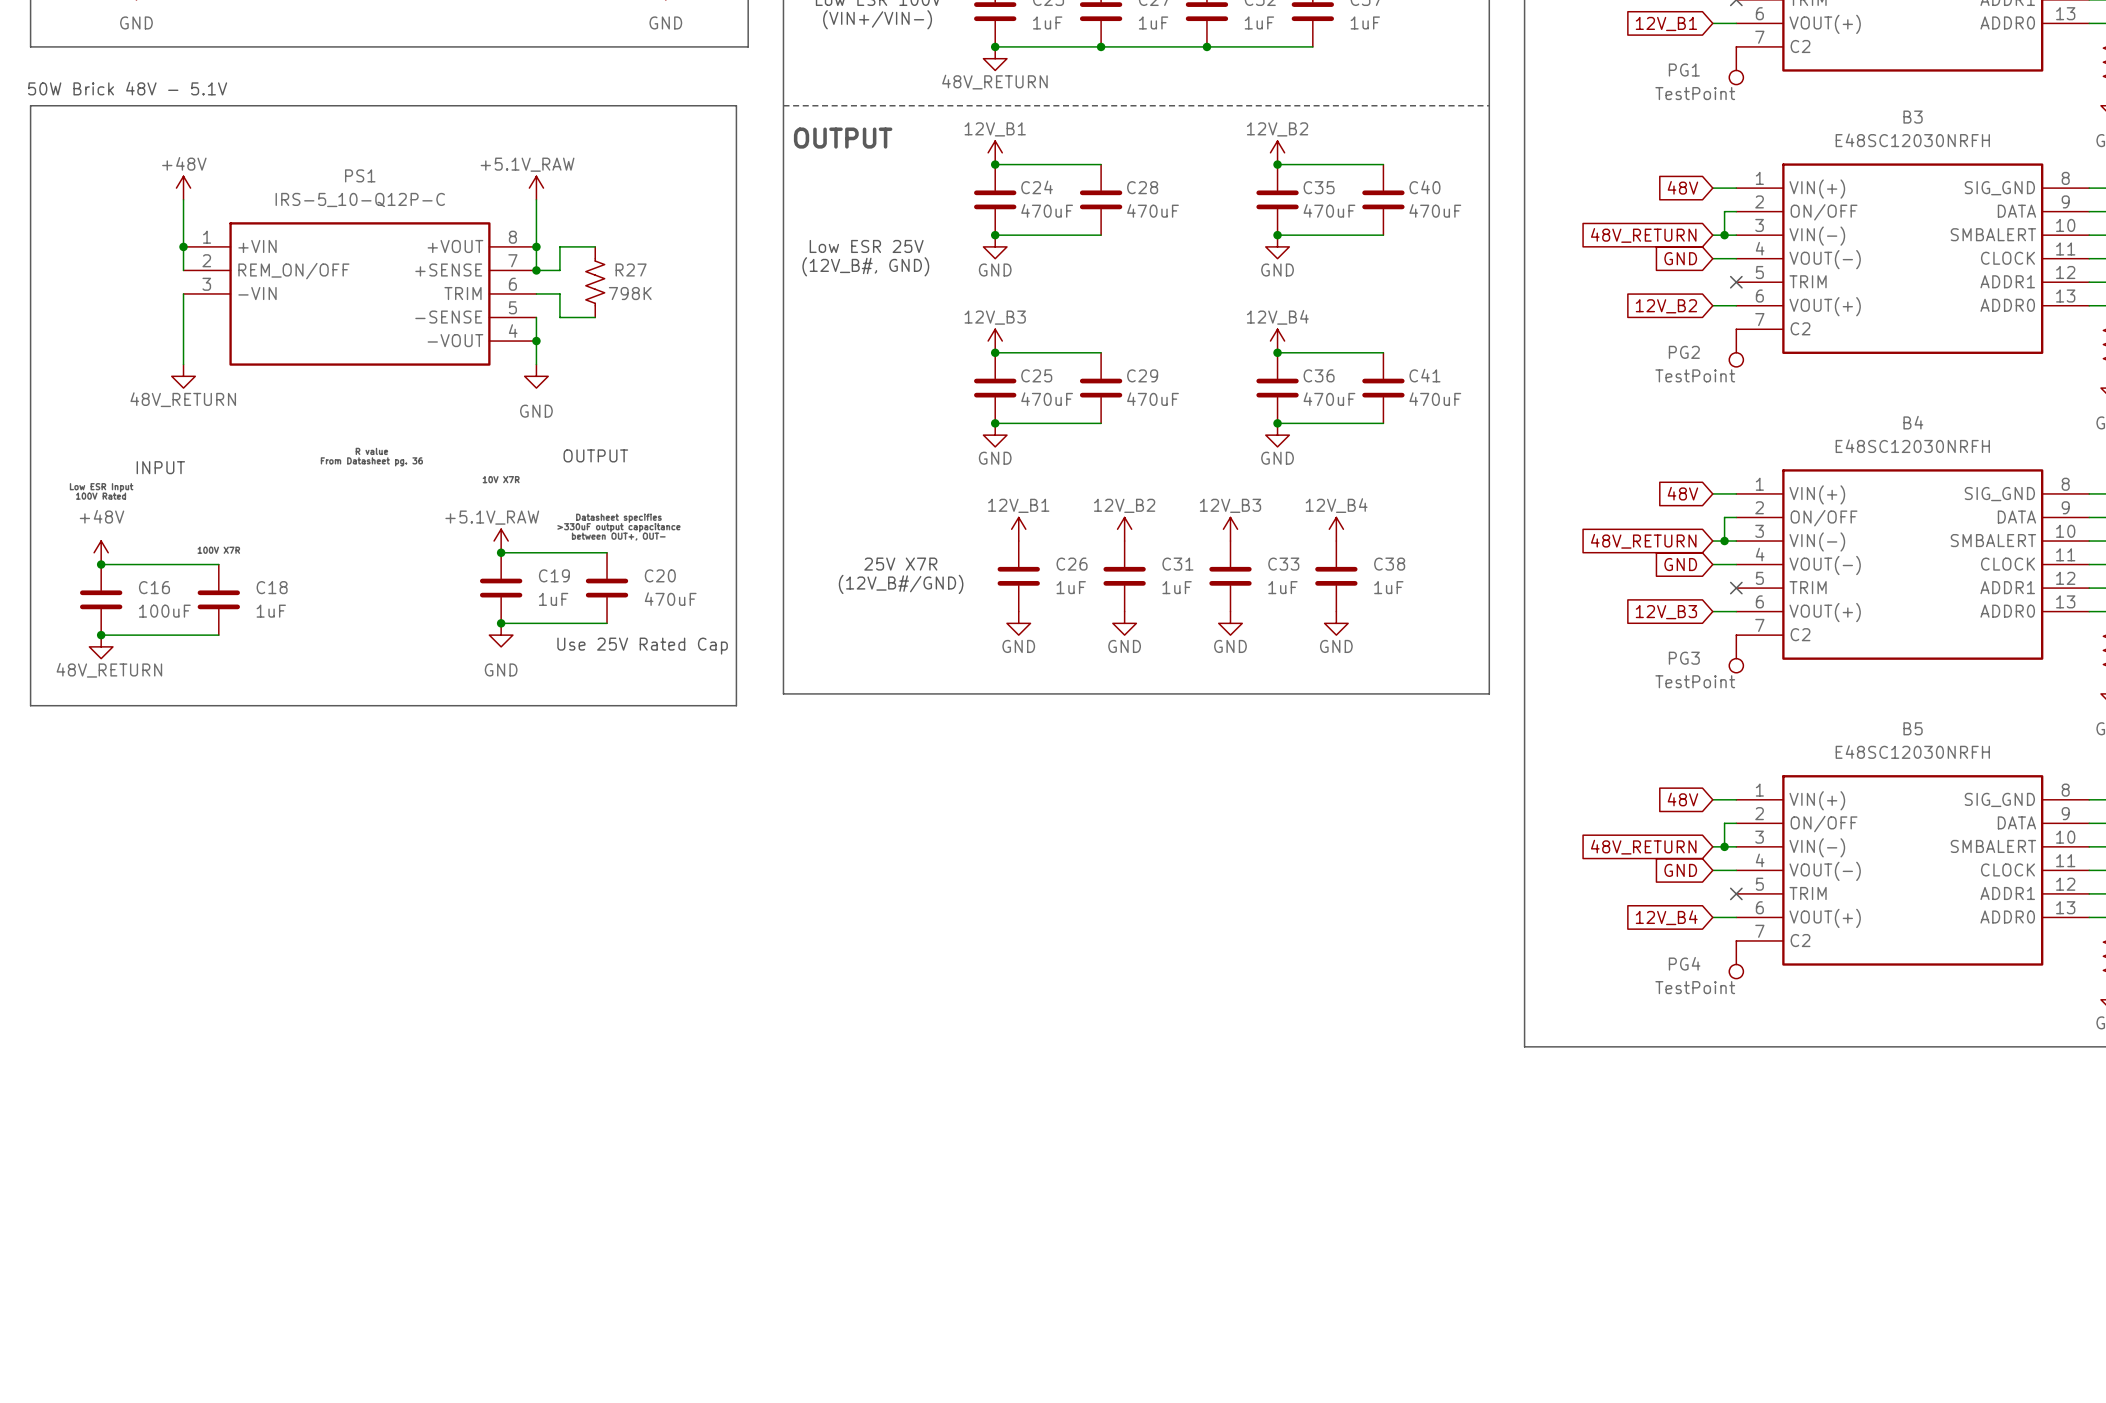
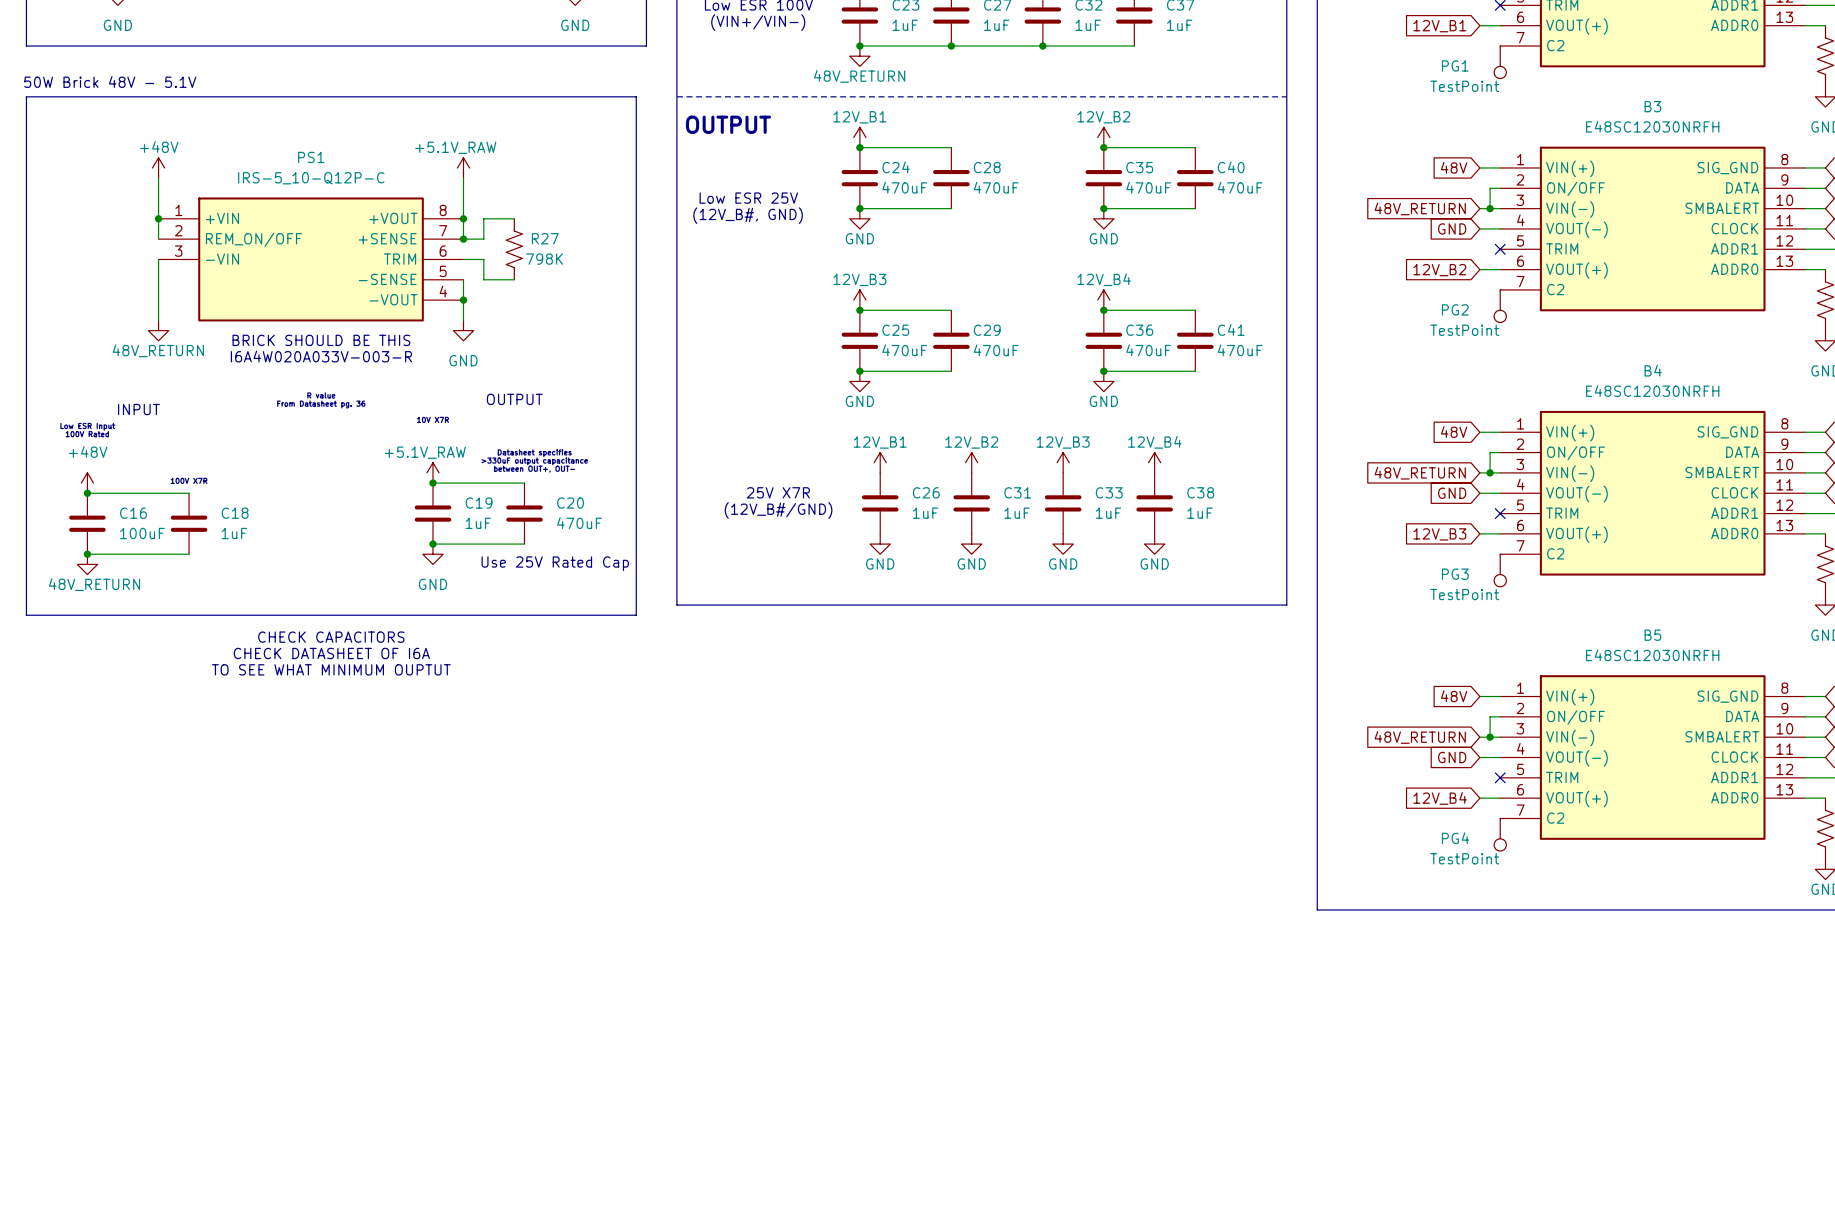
text: none -> Low ESR 25V (748, 198)
text: Low ESR 25V (866, 246) -> (12V_B#, GND) (748, 215)
text: (12V_B#, GND) (865, 266) -> none
text: none -> BRICK SHOULD BE THIS (321, 340)
text: none -> I6A4W020A033V-003-R (321, 356)
text: none -> CHECK CAPACITORS (331, 637)
text: none -> CHECK DATASHEET OF I6A (331, 653)
text: none -> TO SEE WHAT MINIMUM OUPTUT (331, 669)

